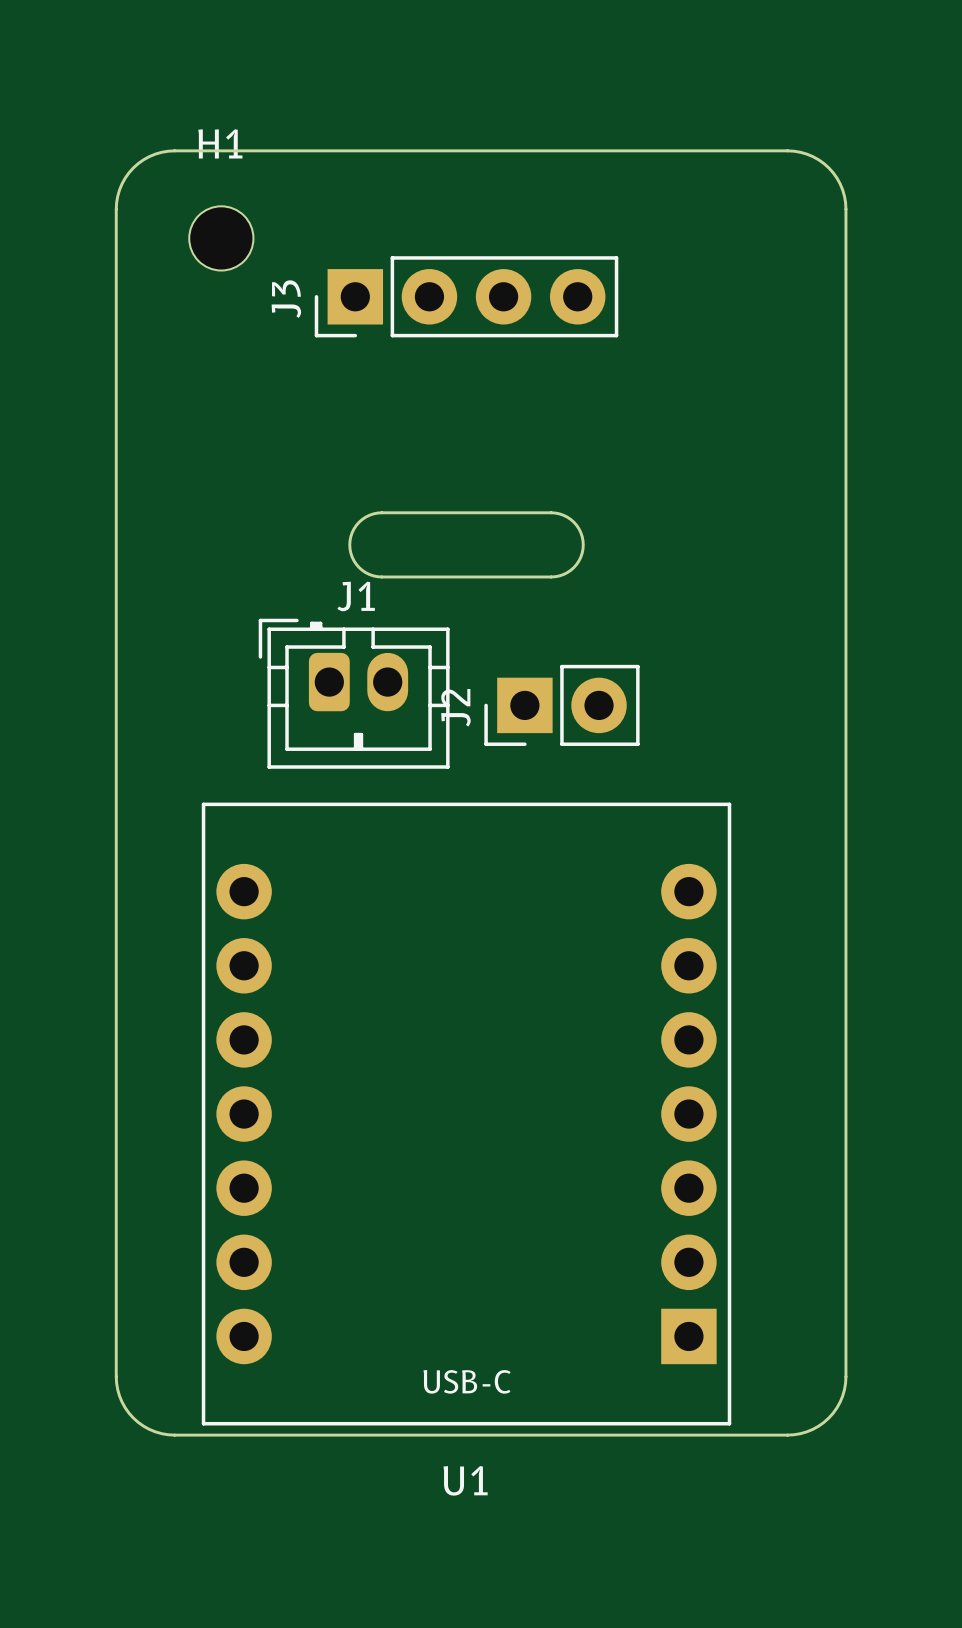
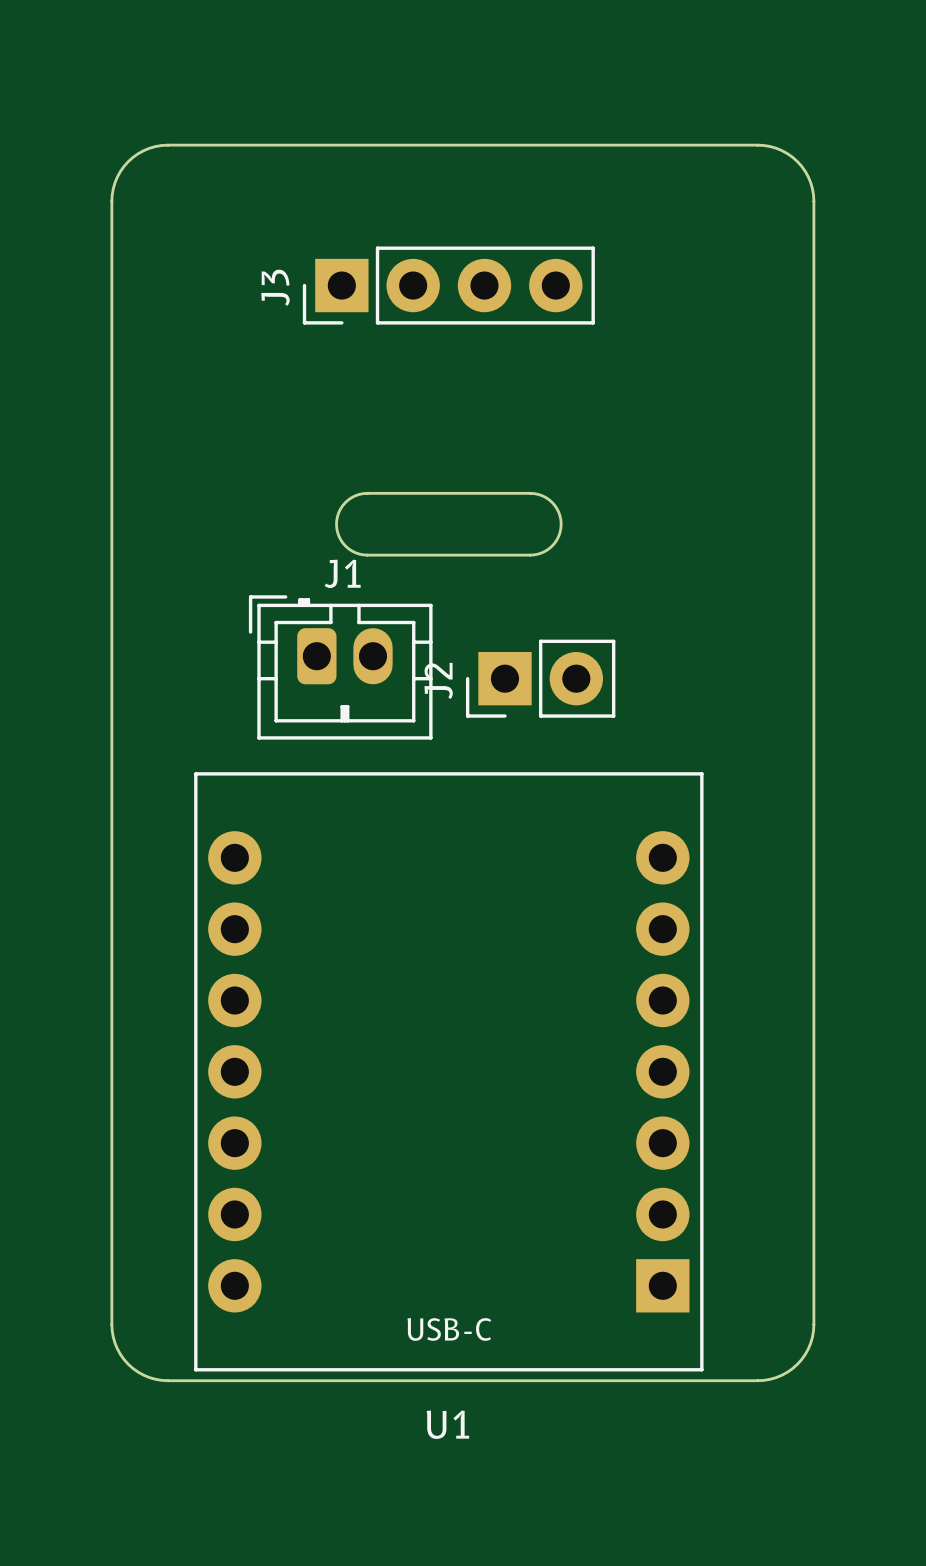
H1: (221, 238) -> none

